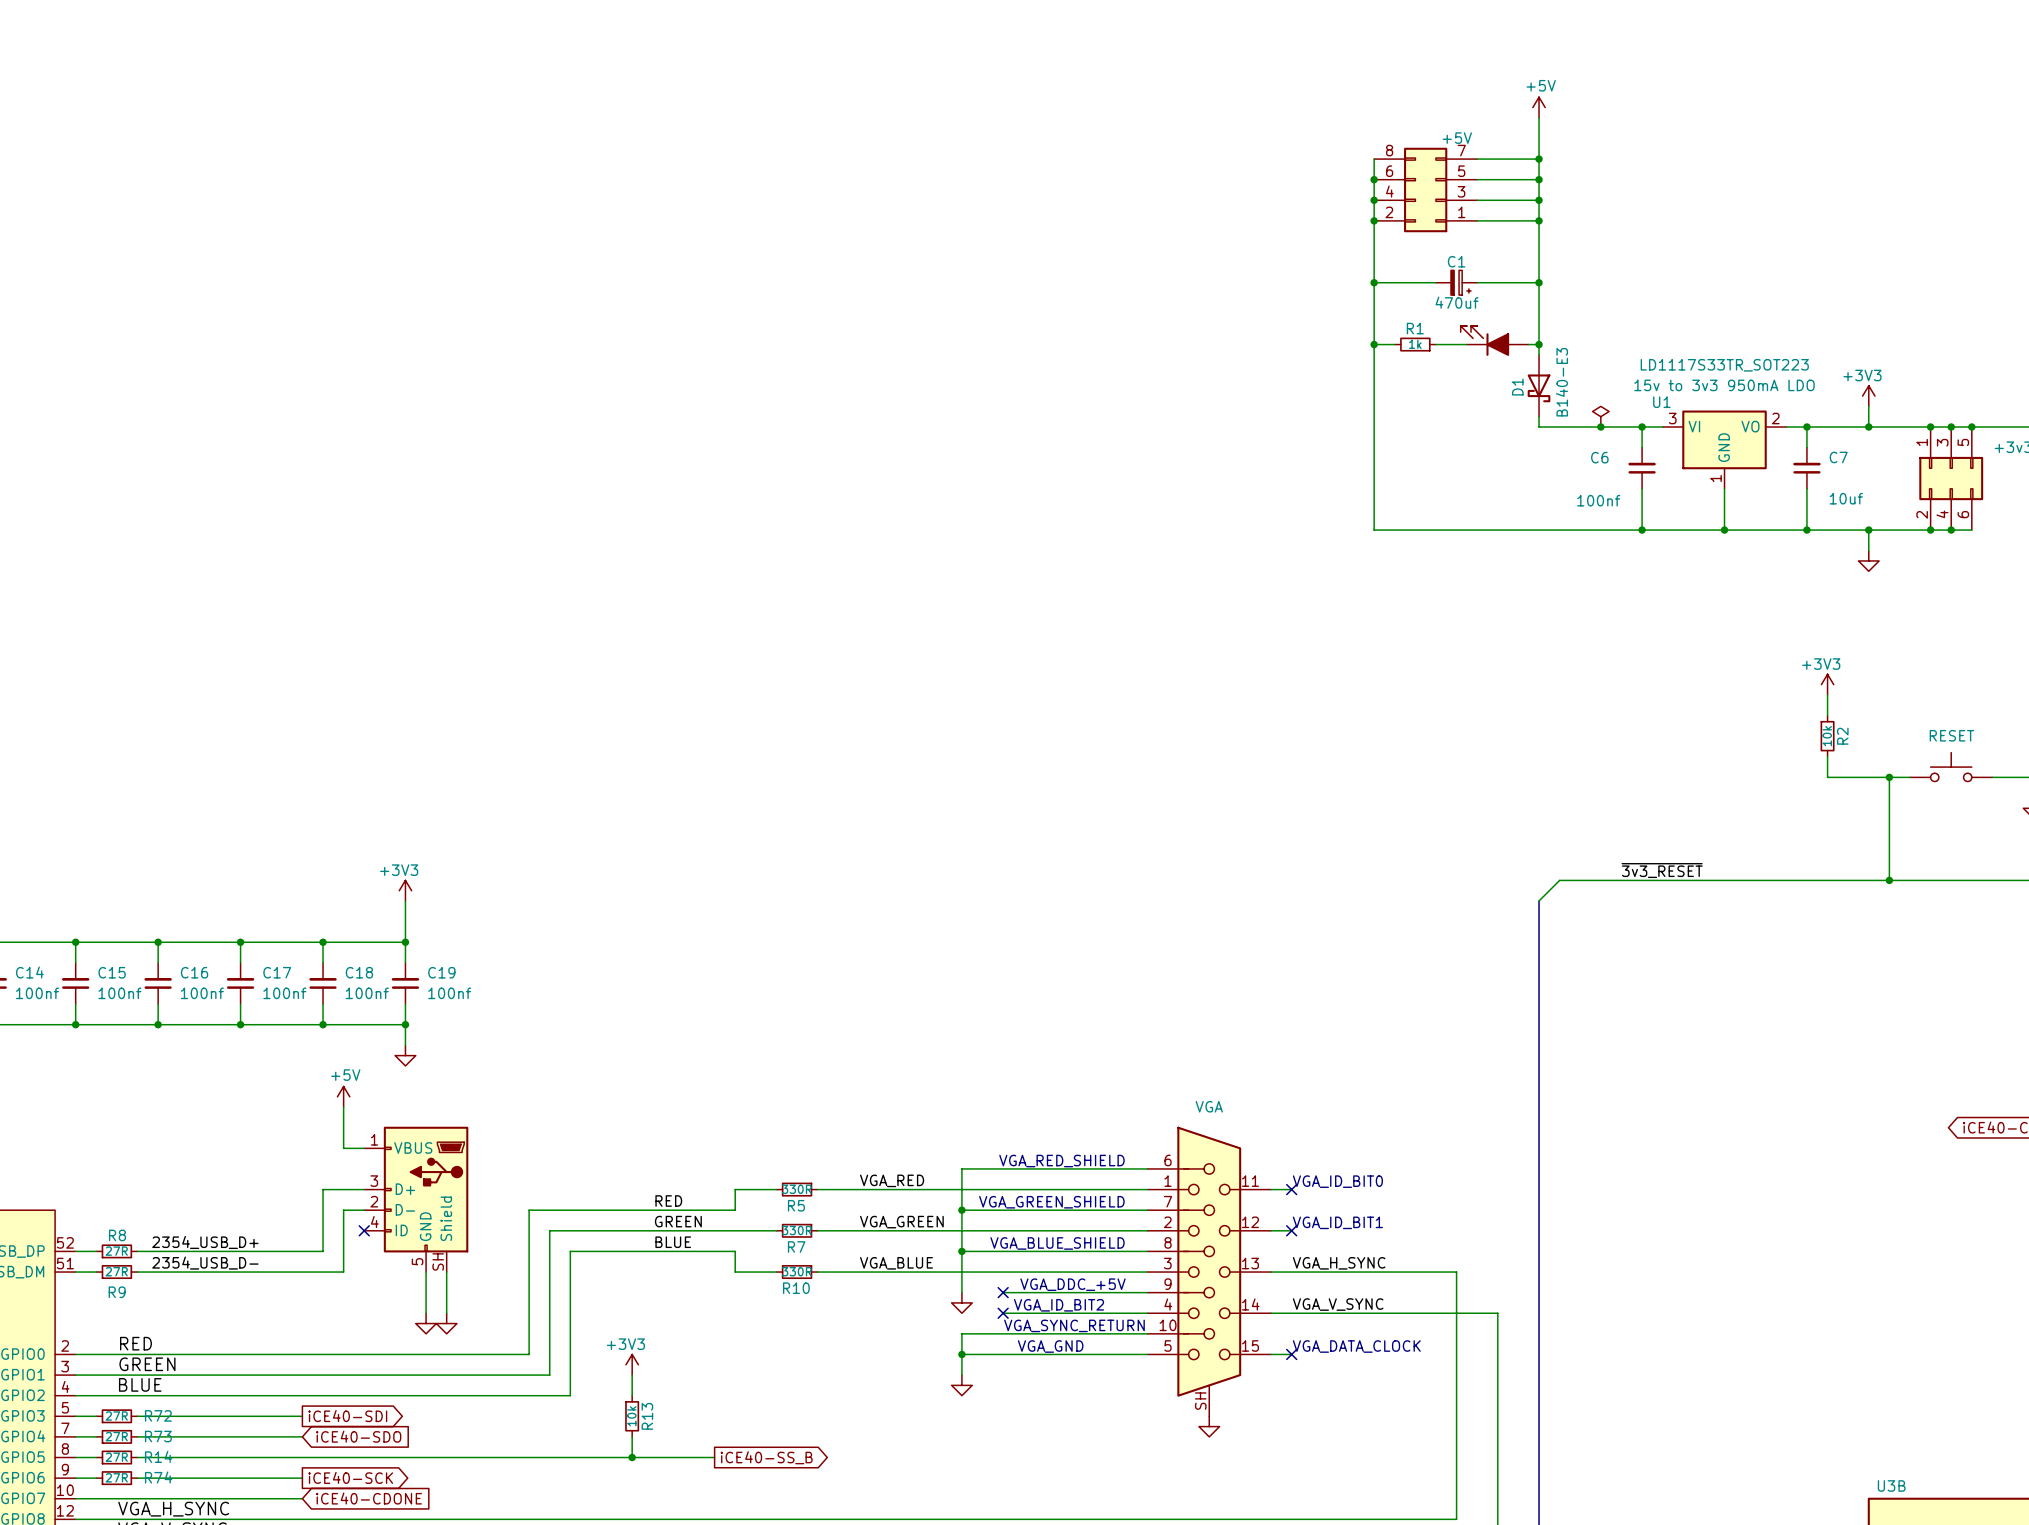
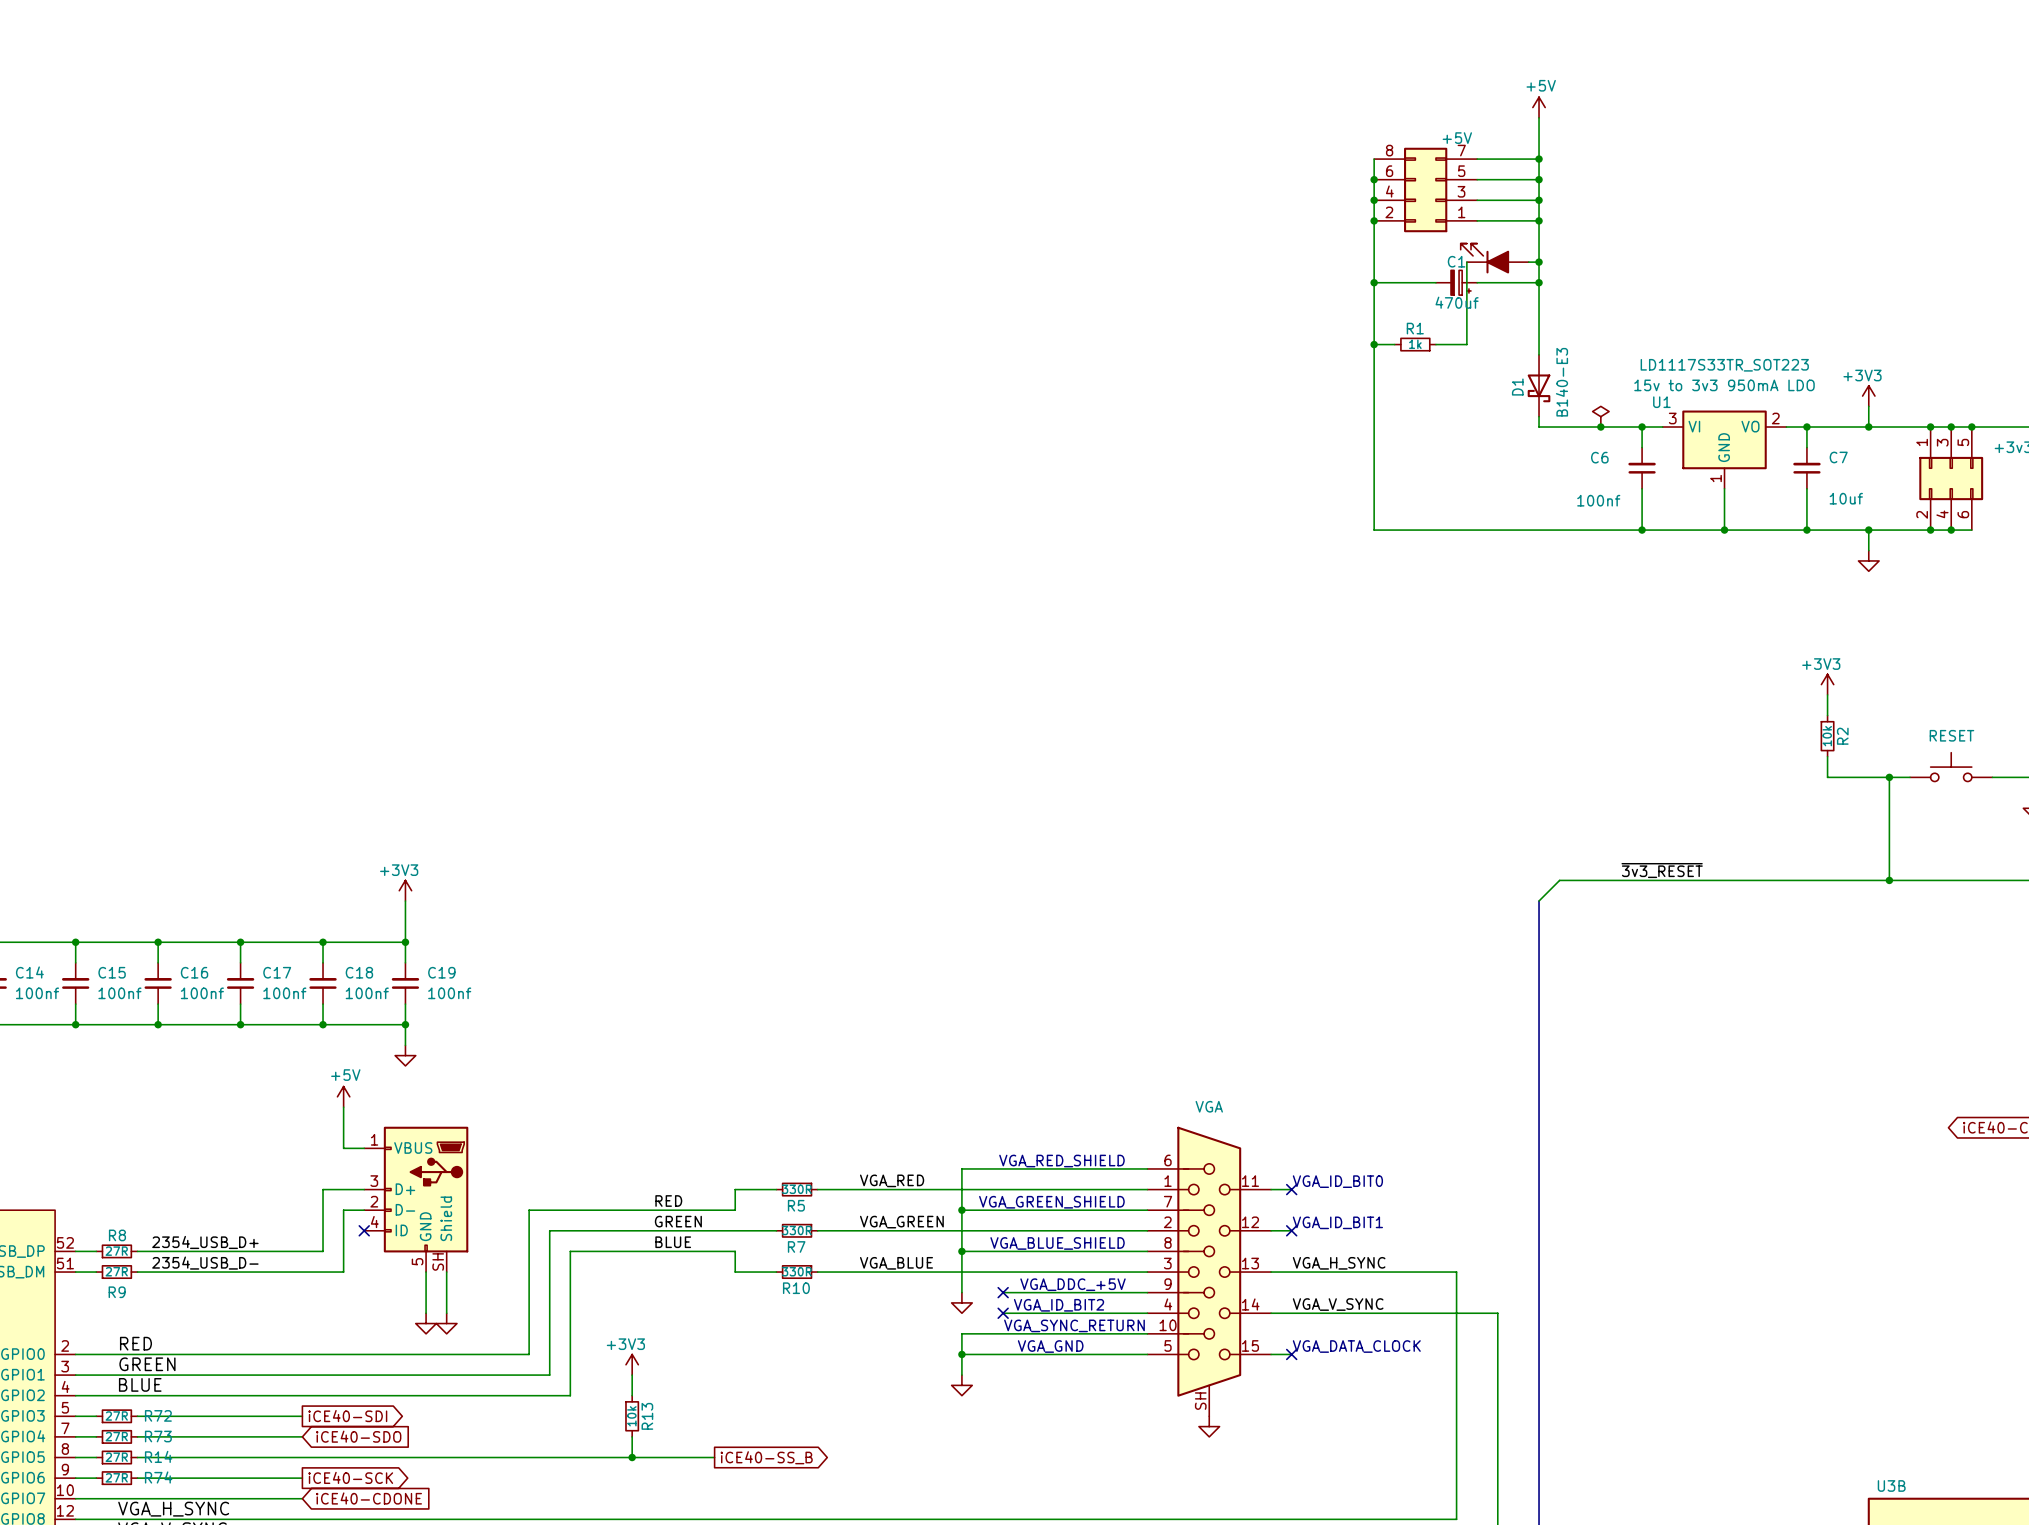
wire: none -> (1466, 262) (1466, 344)
junction: none -> (1539, 262)
part position: (1494, 340) -> (1494, 258)
wire: (1528, 344) (1539, 344) -> (1528, 262) (1539, 262)
junction: (1539, 344) -> none

